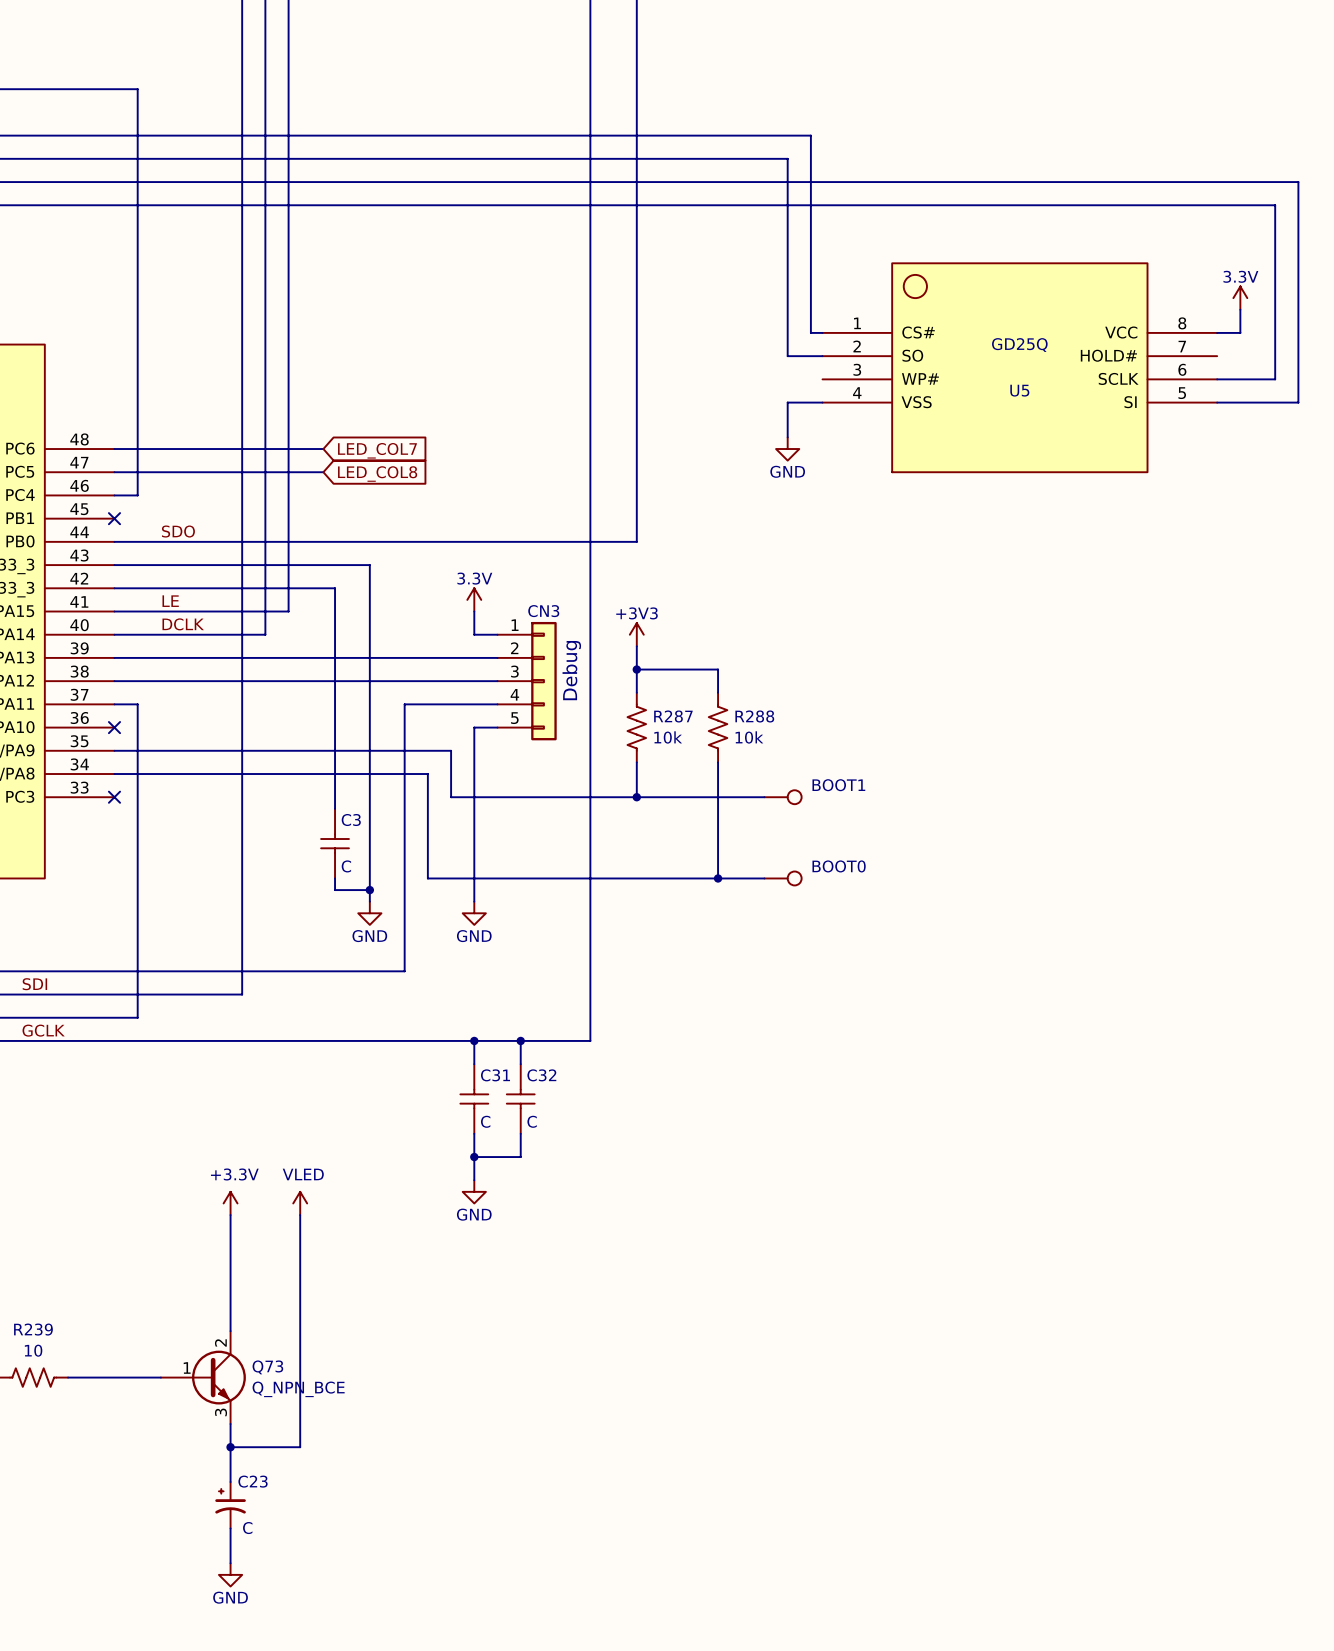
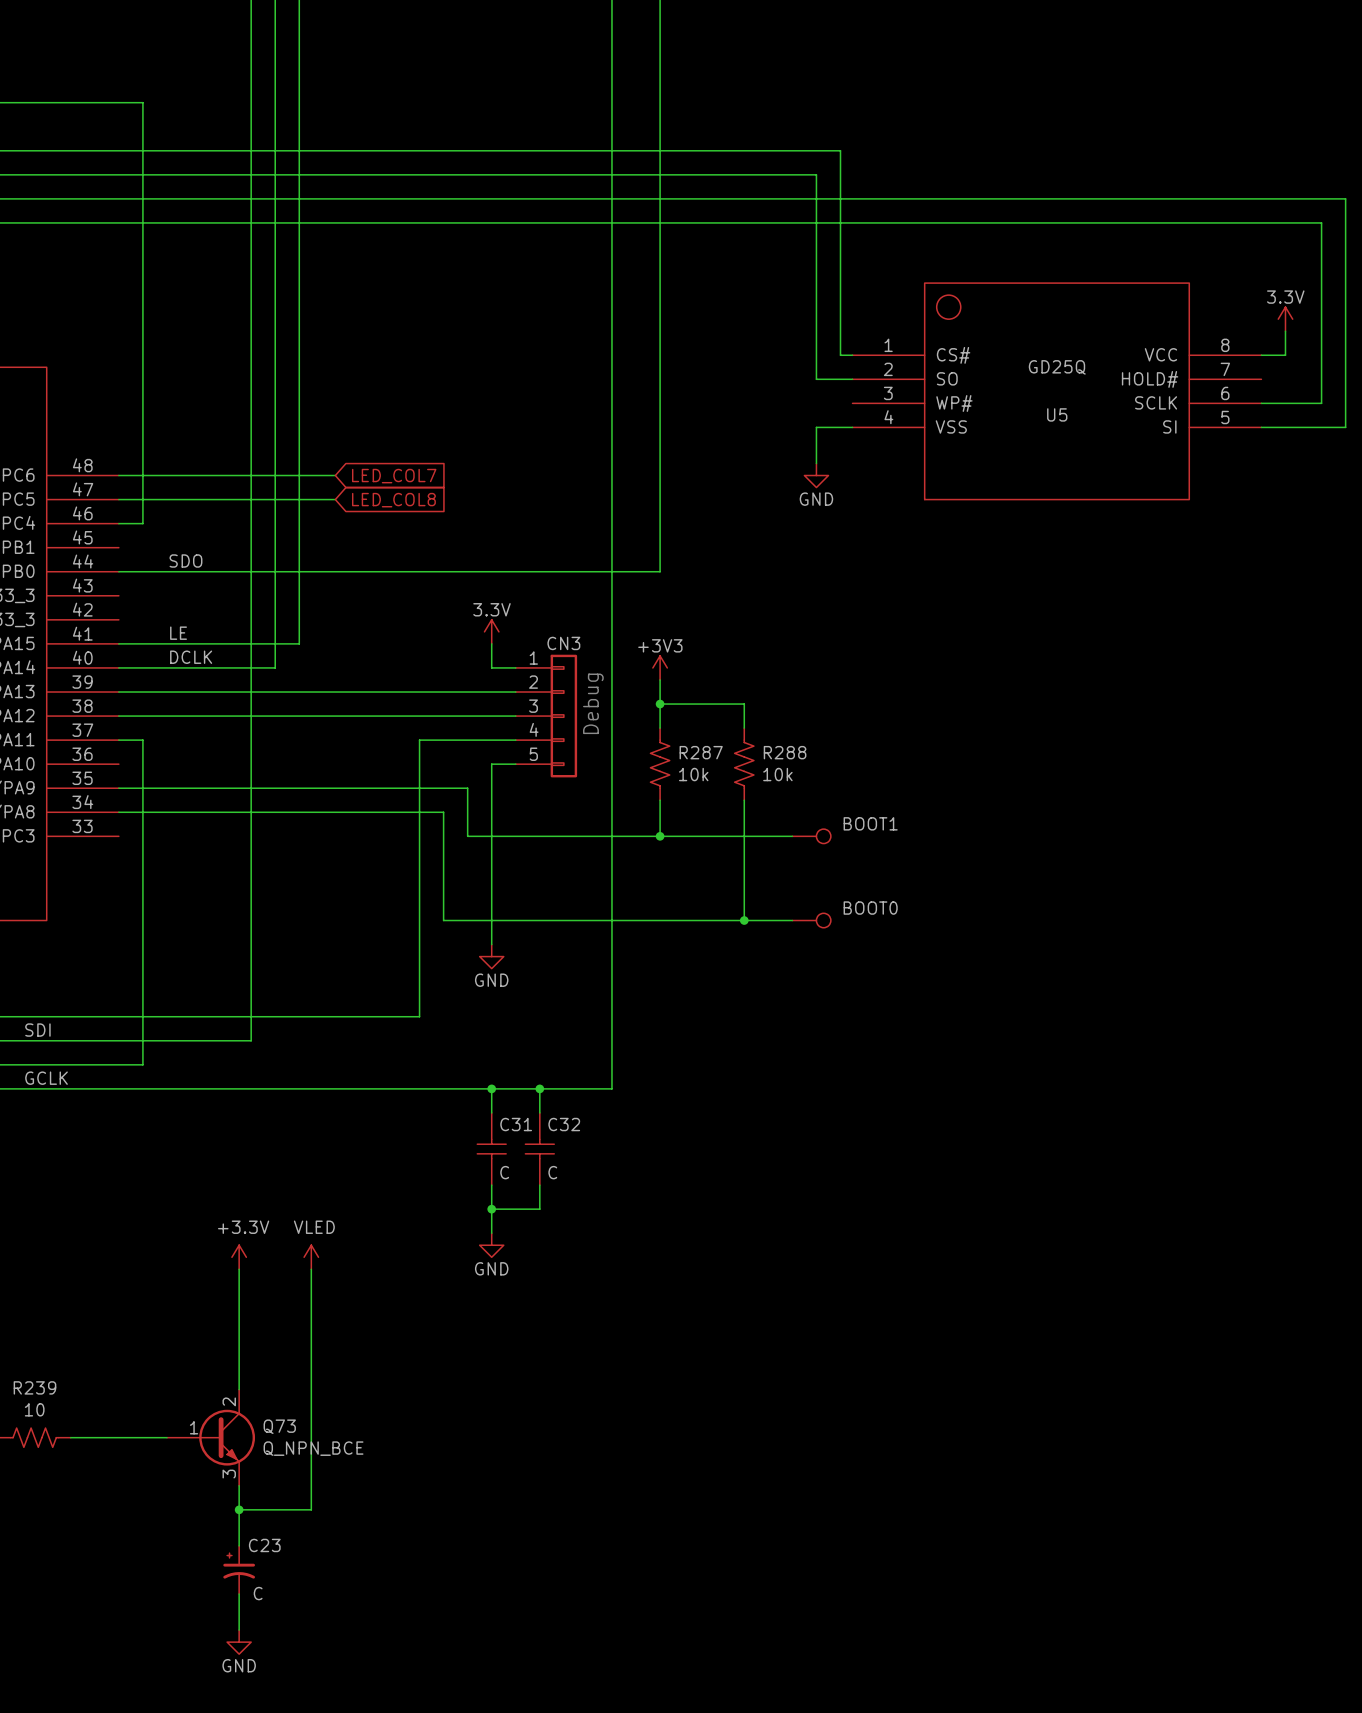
no-connect mark: (114, 518) -> none
wire: (114, 565) (369, 565) (369, 901) -> none
wire: (114, 588) (335, 588) (335, 808) -> none
no-connect mark: (114, 727) -> none
no-connect mark: (114, 797) -> none
C3: C (335, 843) -> none
wire: (335, 878) (335, 890) (369, 890) -> none
junction: (369, 890) -> none
power symbol: GND (369, 913) -> none

